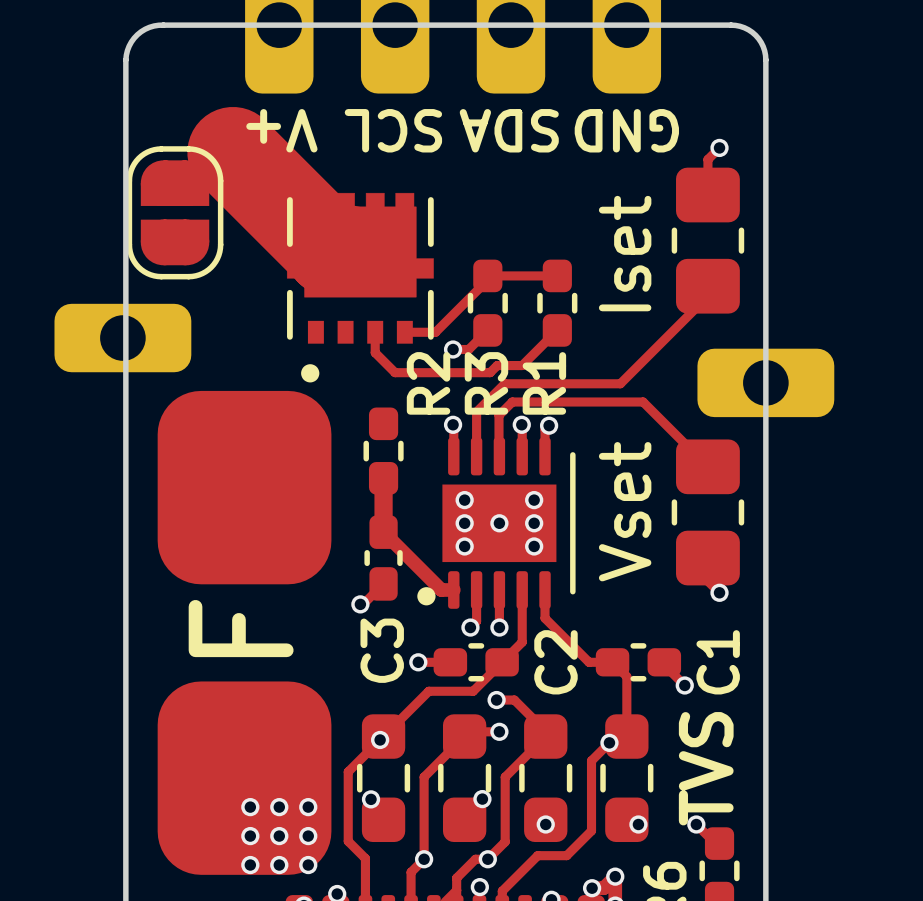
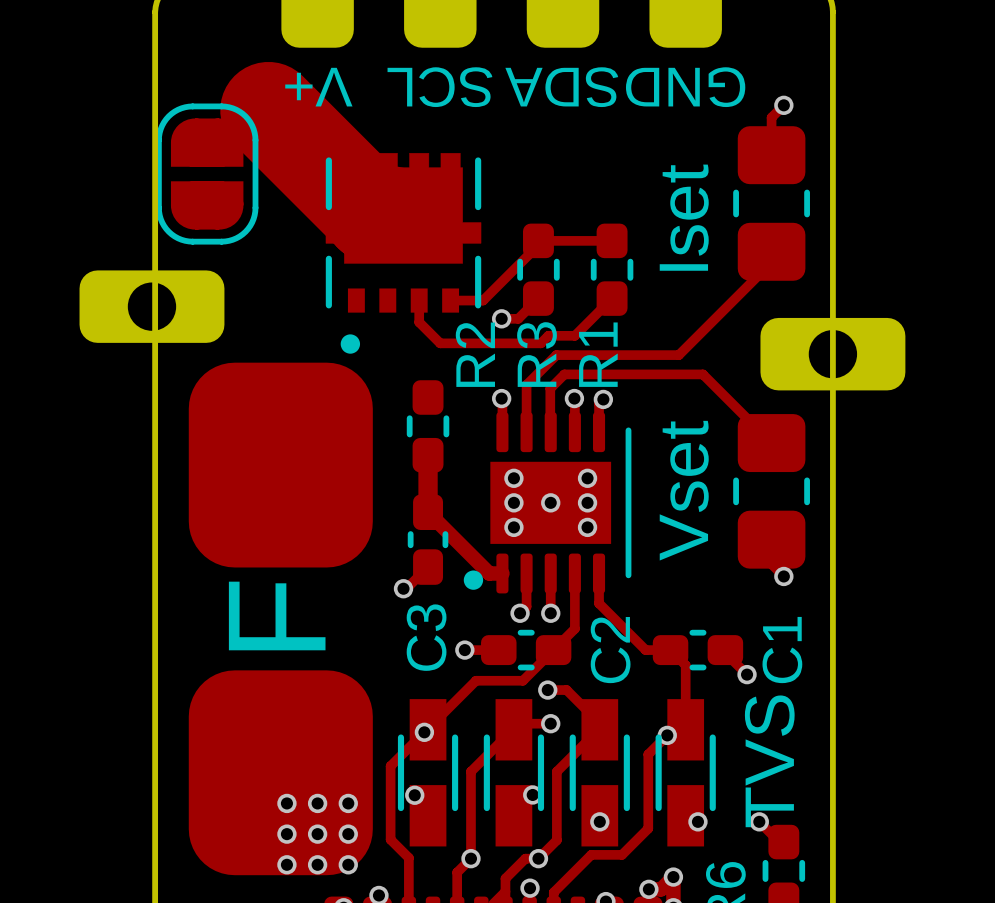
part footprint: [356, 714, 411, 843] -> [397, 699, 459, 847]
part footprint: [438, 714, 492, 843] -> [483, 699, 545, 847]
part footprint: [519, 714, 573, 843] -> [569, 699, 630, 847]
part footprint: [600, 714, 654, 843] -> [655, 699, 716, 847]

